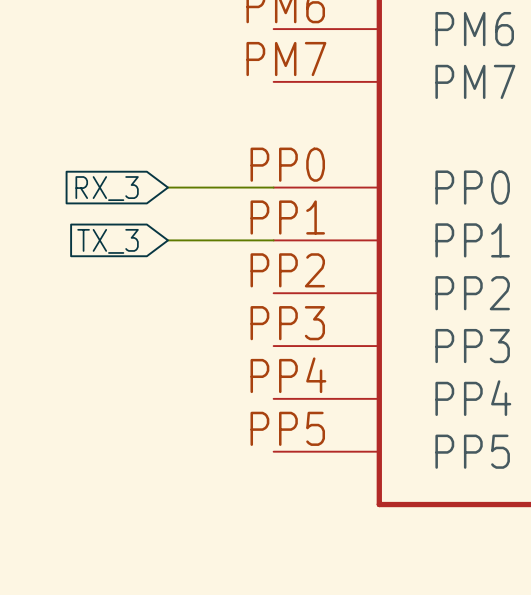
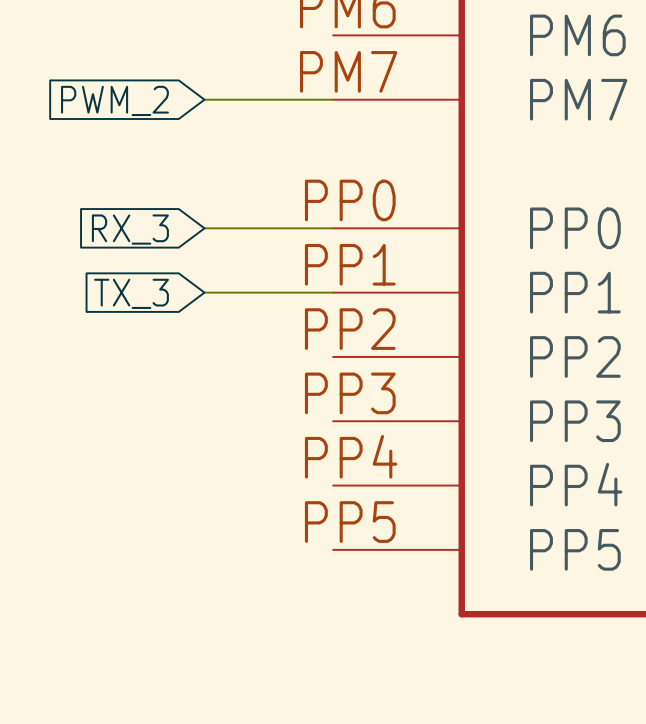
wire: none -> (204, 99) (333, 99)
global label: none -> PWM_2 (114, 100)

